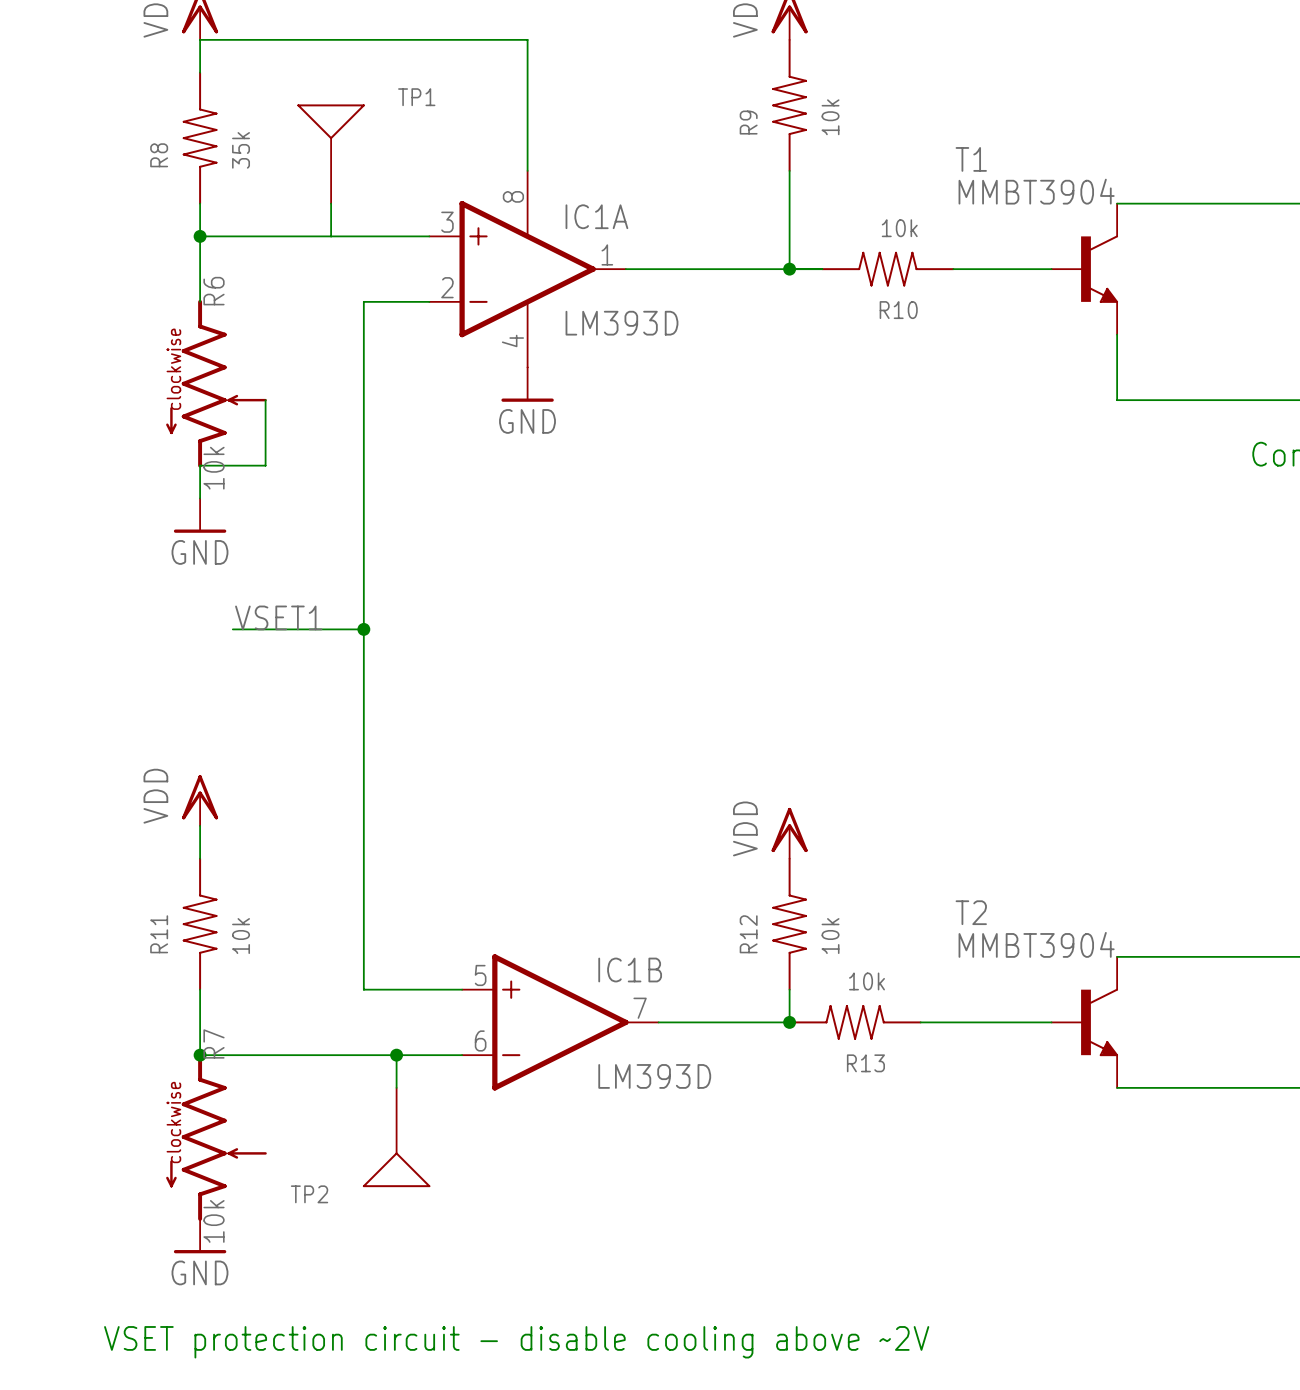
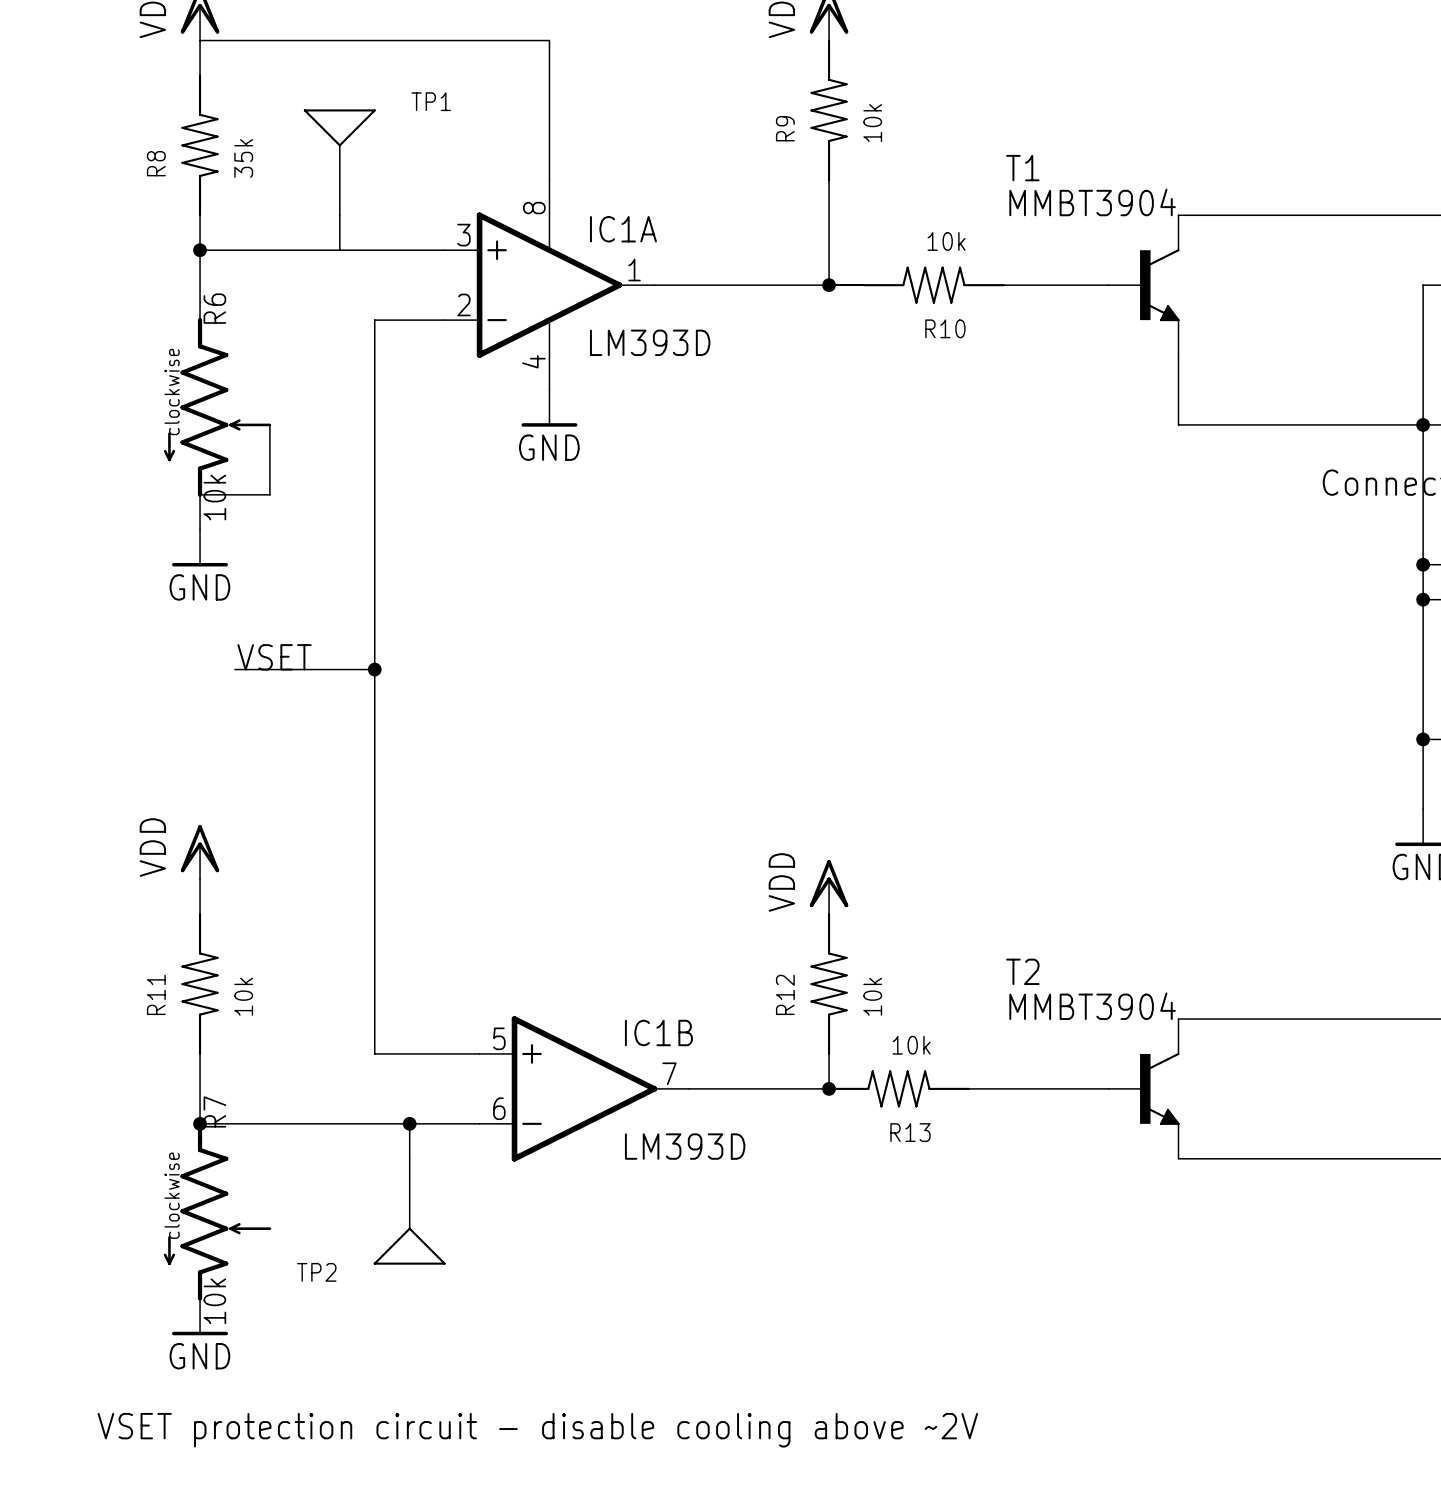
label: VSET1 (278, 617) -> VSET (274, 657)

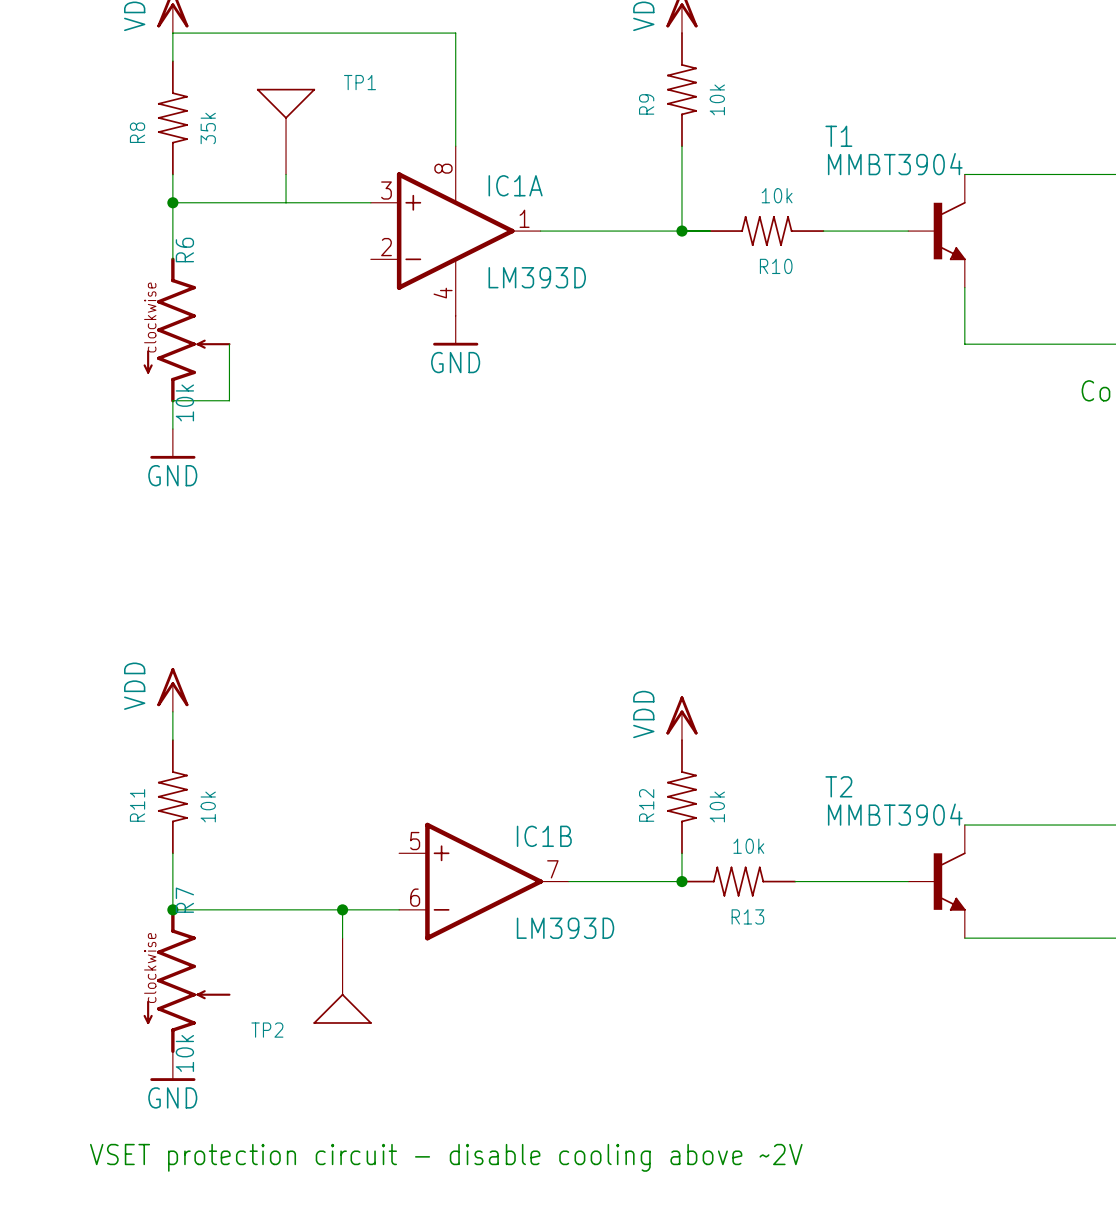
wire: (444, 320) (374, 320) (374, 1053) (479, 1053) -> none
label: VSET (274, 657) -> none
wire: (234, 669) (374, 669) -> none
junction: (374, 669) -> none

